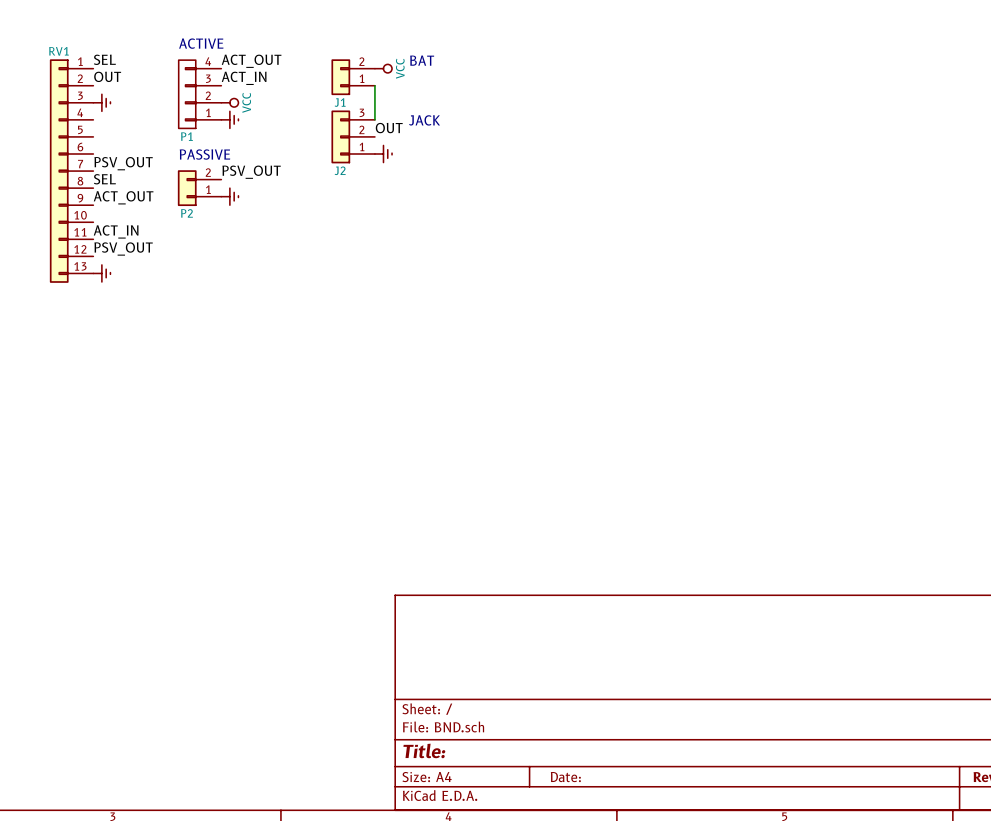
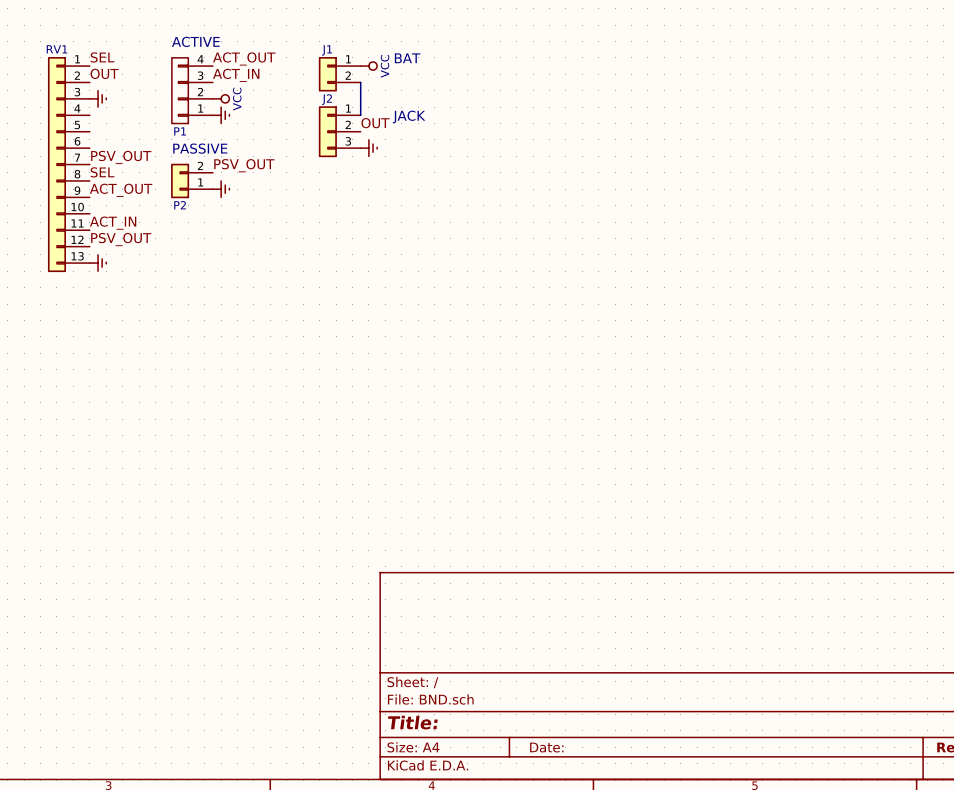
J1 flip: as is (340, 77) -> up-down (327, 74)
J2 flip: as is (340, 136) -> up-down (327, 131)

